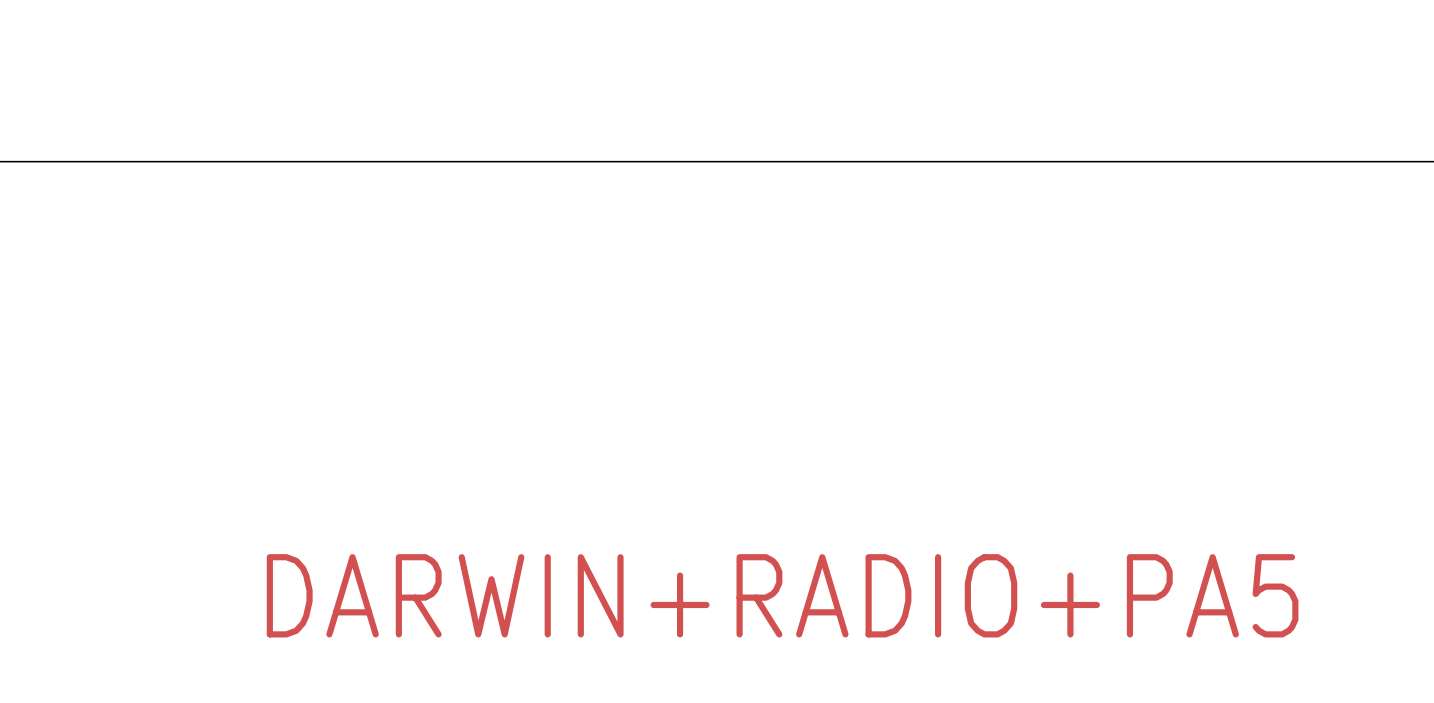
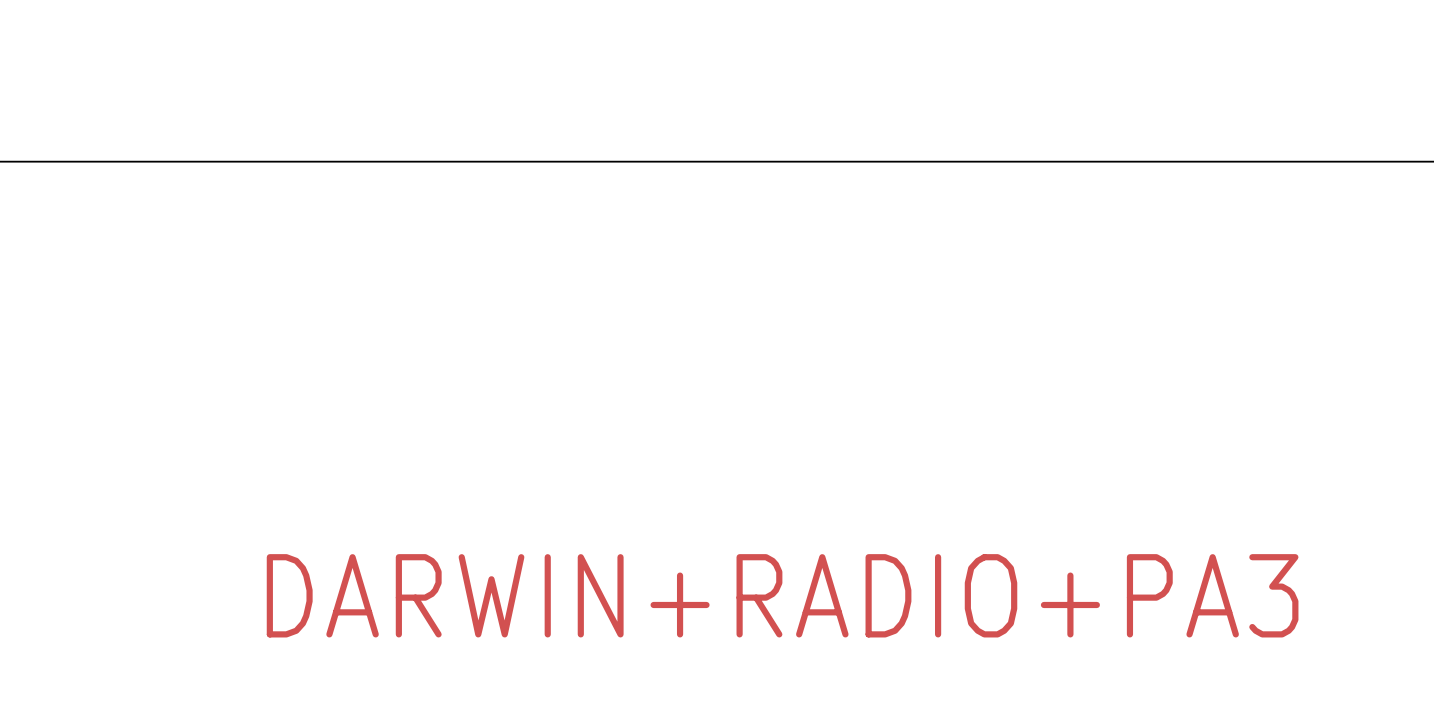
text: DARWIN+RADIO+PA5 (782, 595) -> DARWIN+RADIO+PA3 (782, 595)

